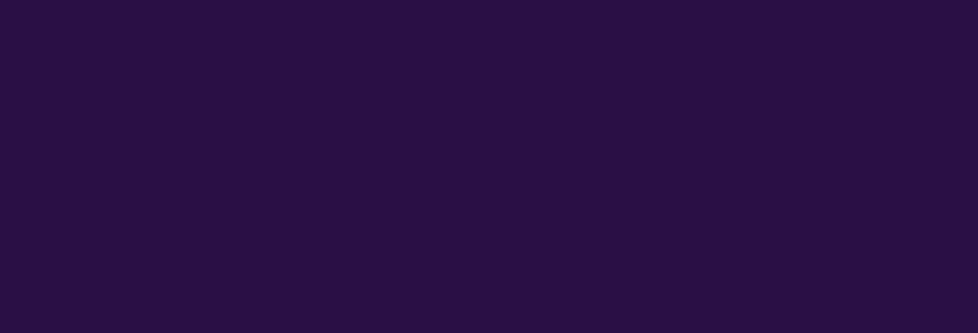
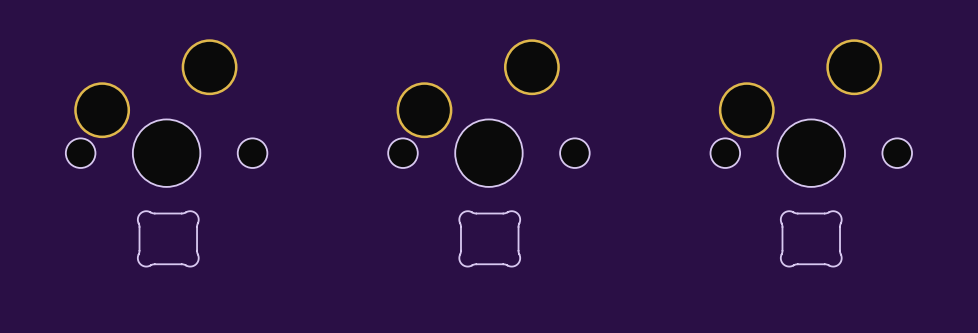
part: none -> (166, 113)
part: none -> (488, 113)
part: none -> (811, 113)
part: none -> (168, 238)
part: none -> (489, 238)
part: none -> (811, 238)

